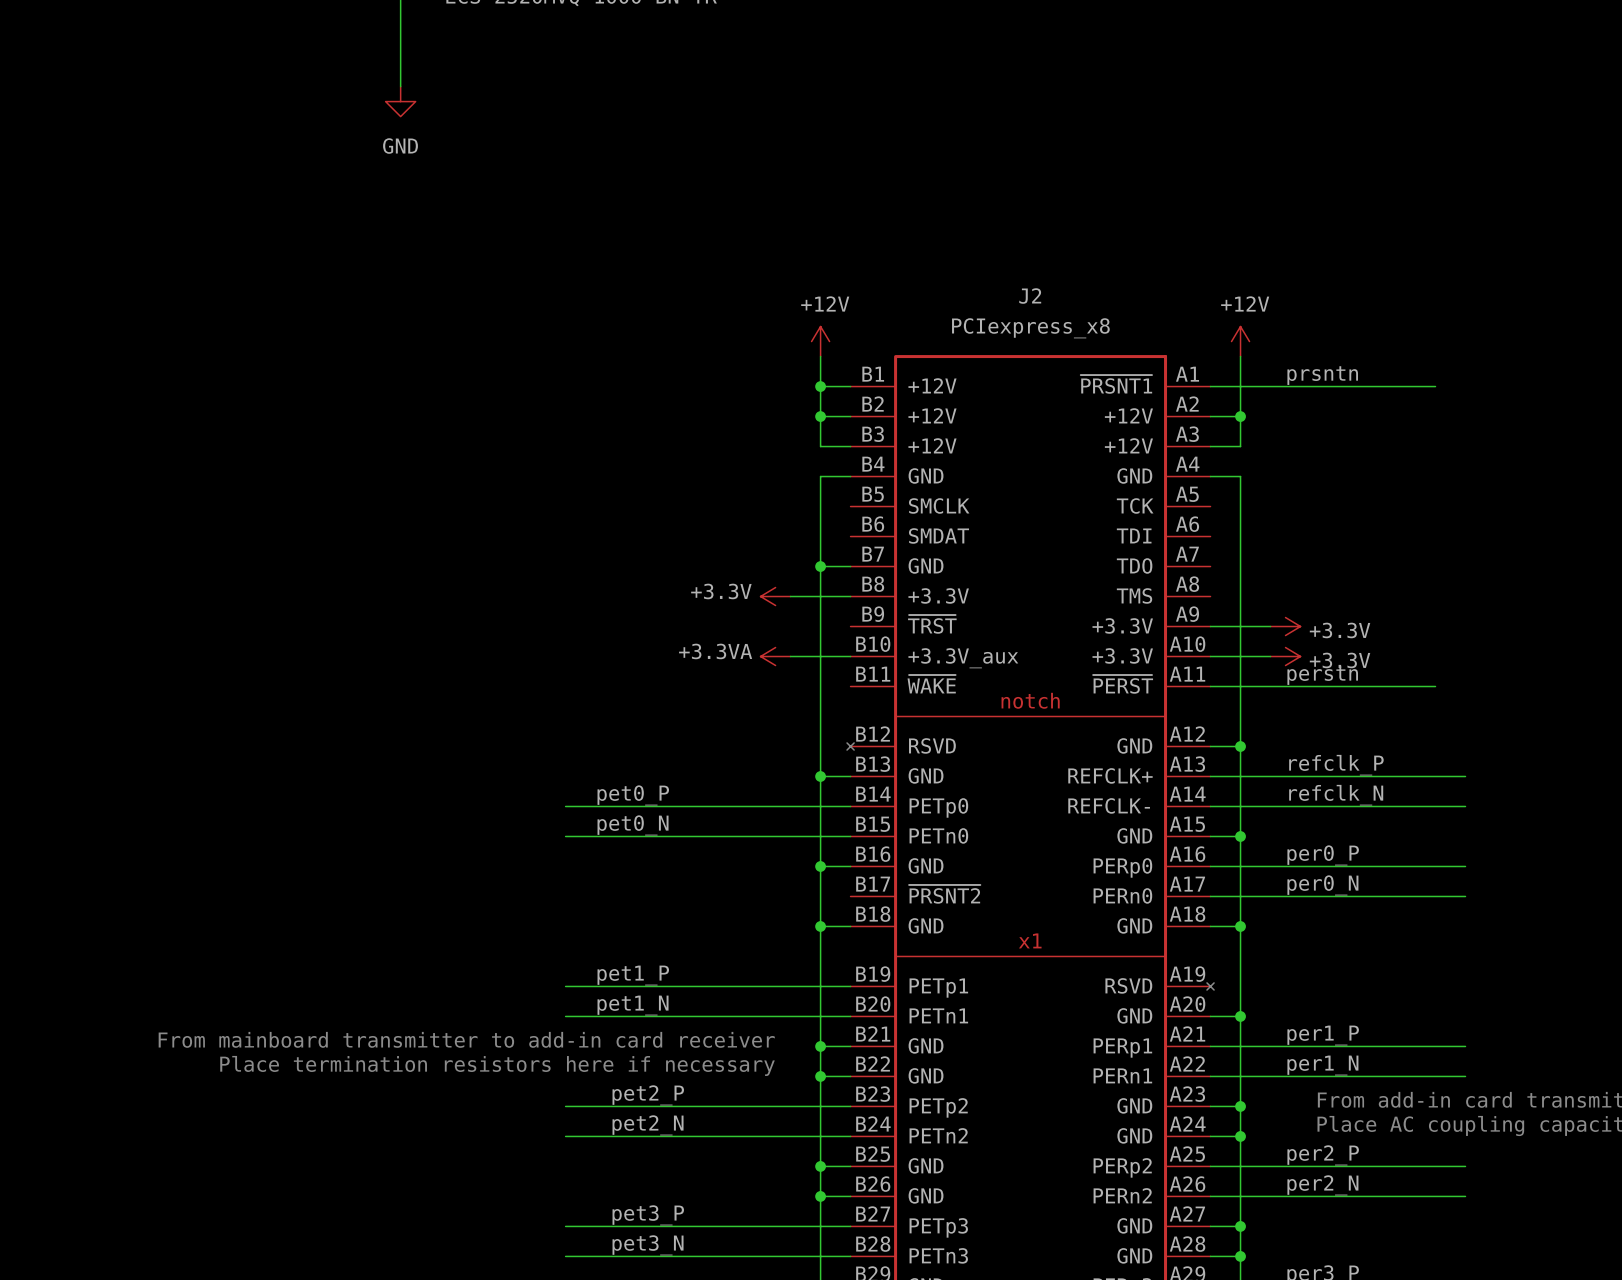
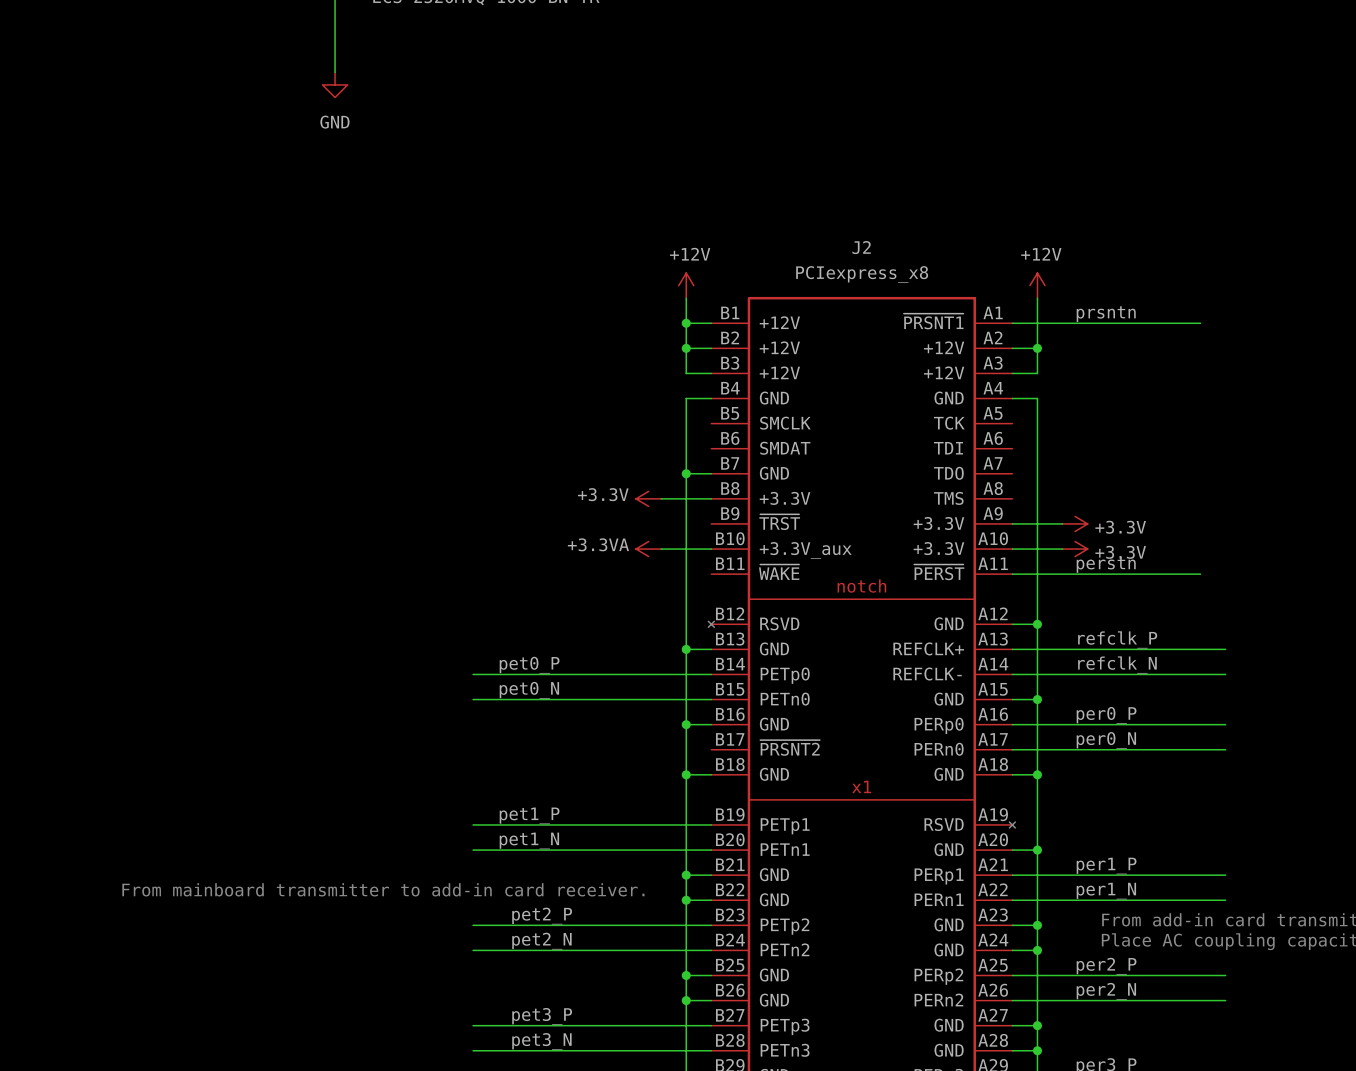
text: From mainboard transmitter to add-in card receiver (466, 1039) -> none
text: Place termination resistors here if necessary (497, 1065) -> From mainboard transmitter to add-in card receiver. (383, 889)

